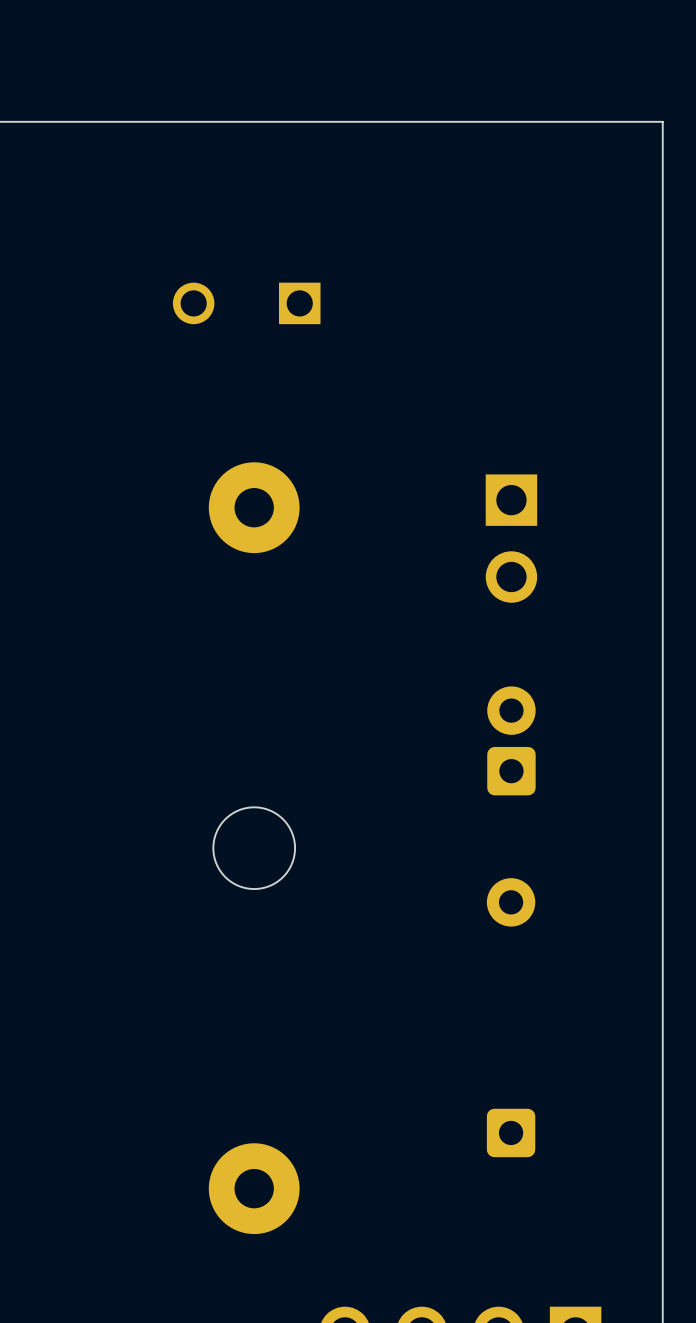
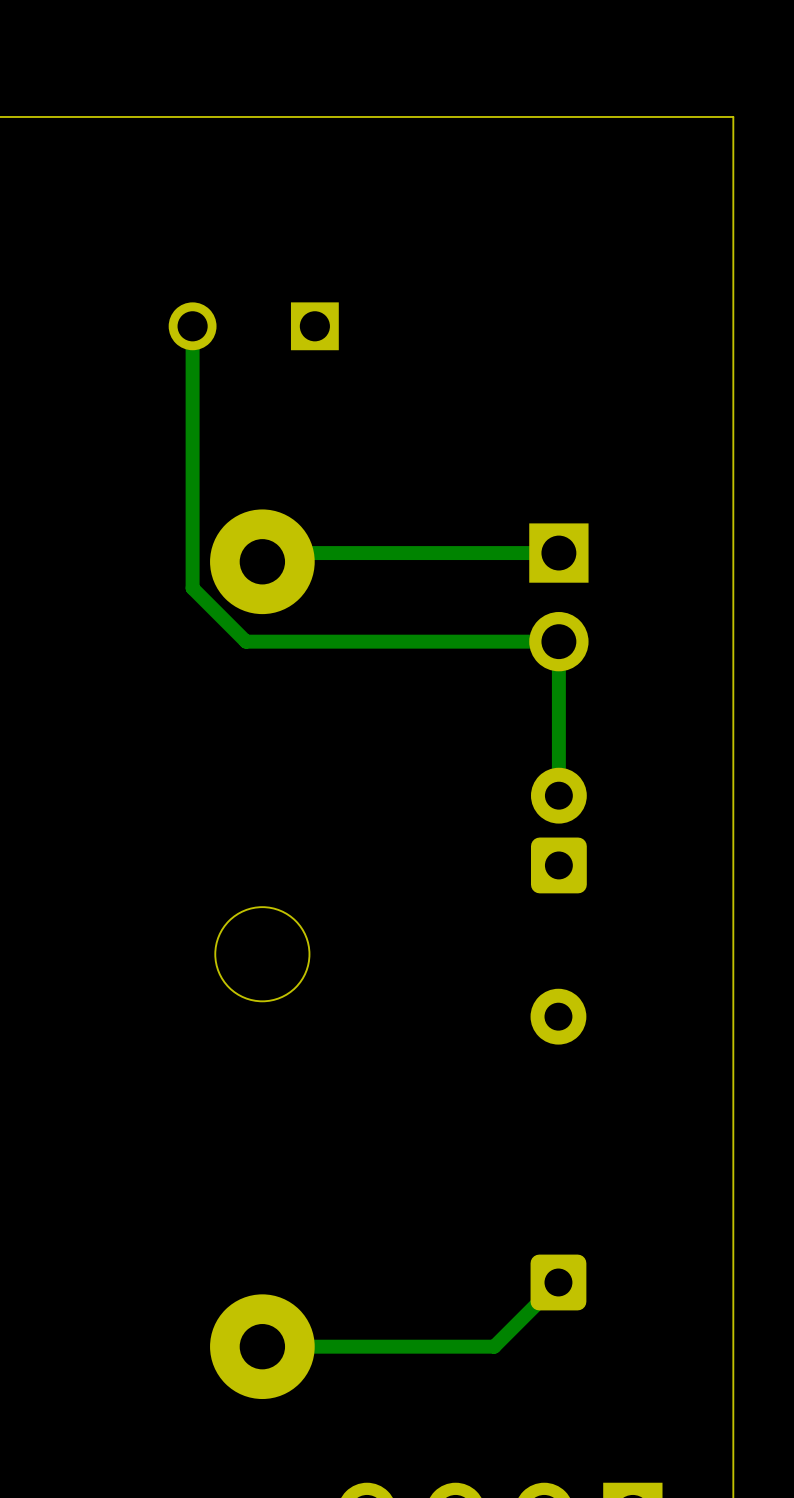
bottom track: none -> (192, 326) (192, 588) (246, 641) (558, 641) (558, 795)
bottom track: none -> (558, 553) (271, 553) (262, 561)
bottom track: none -> (558, 1282) (494, 1346) (262, 1346)

